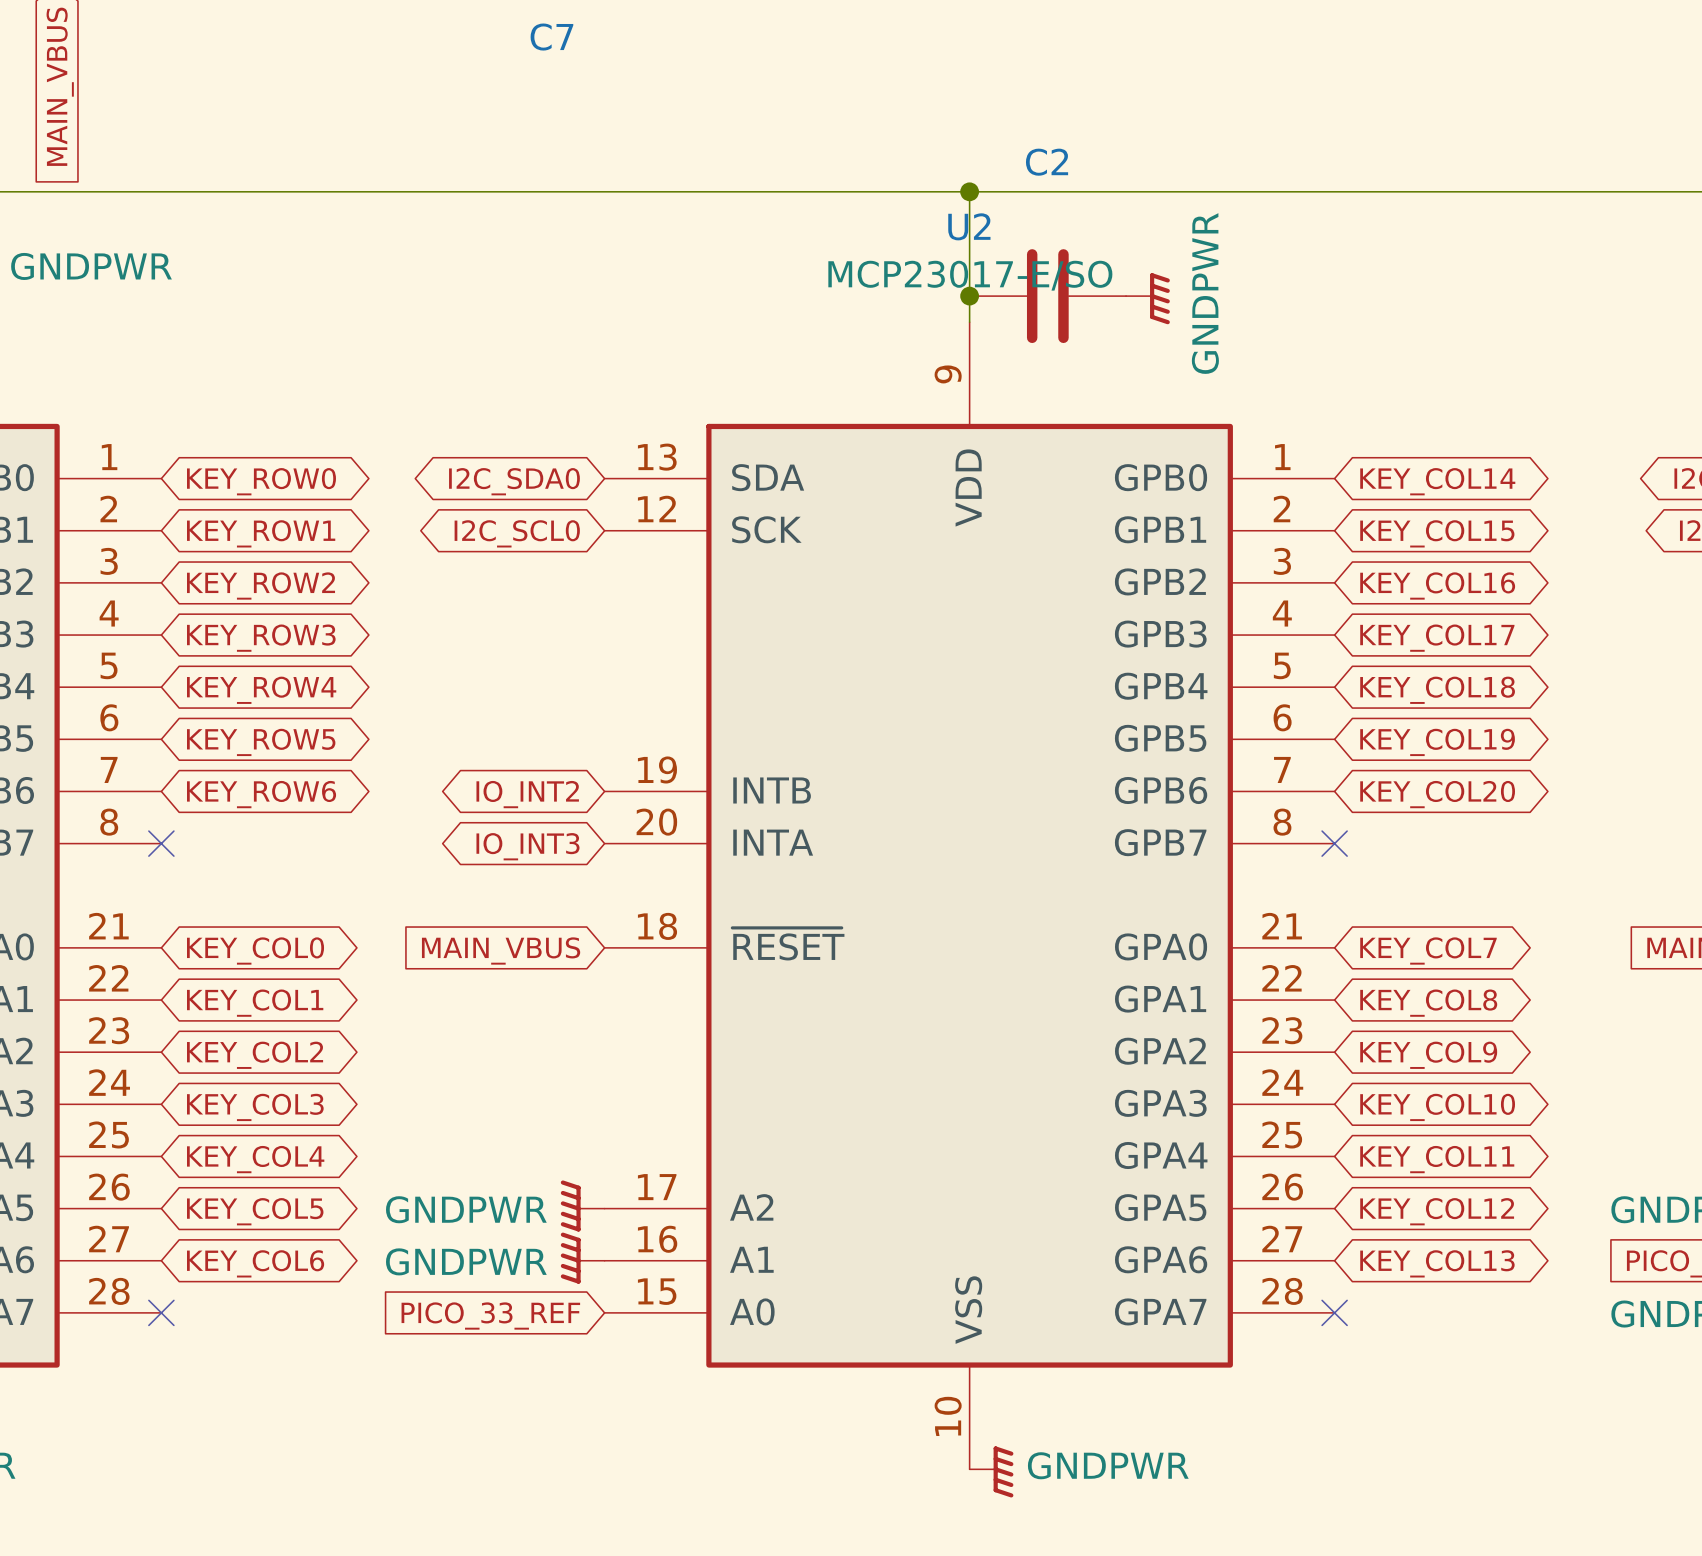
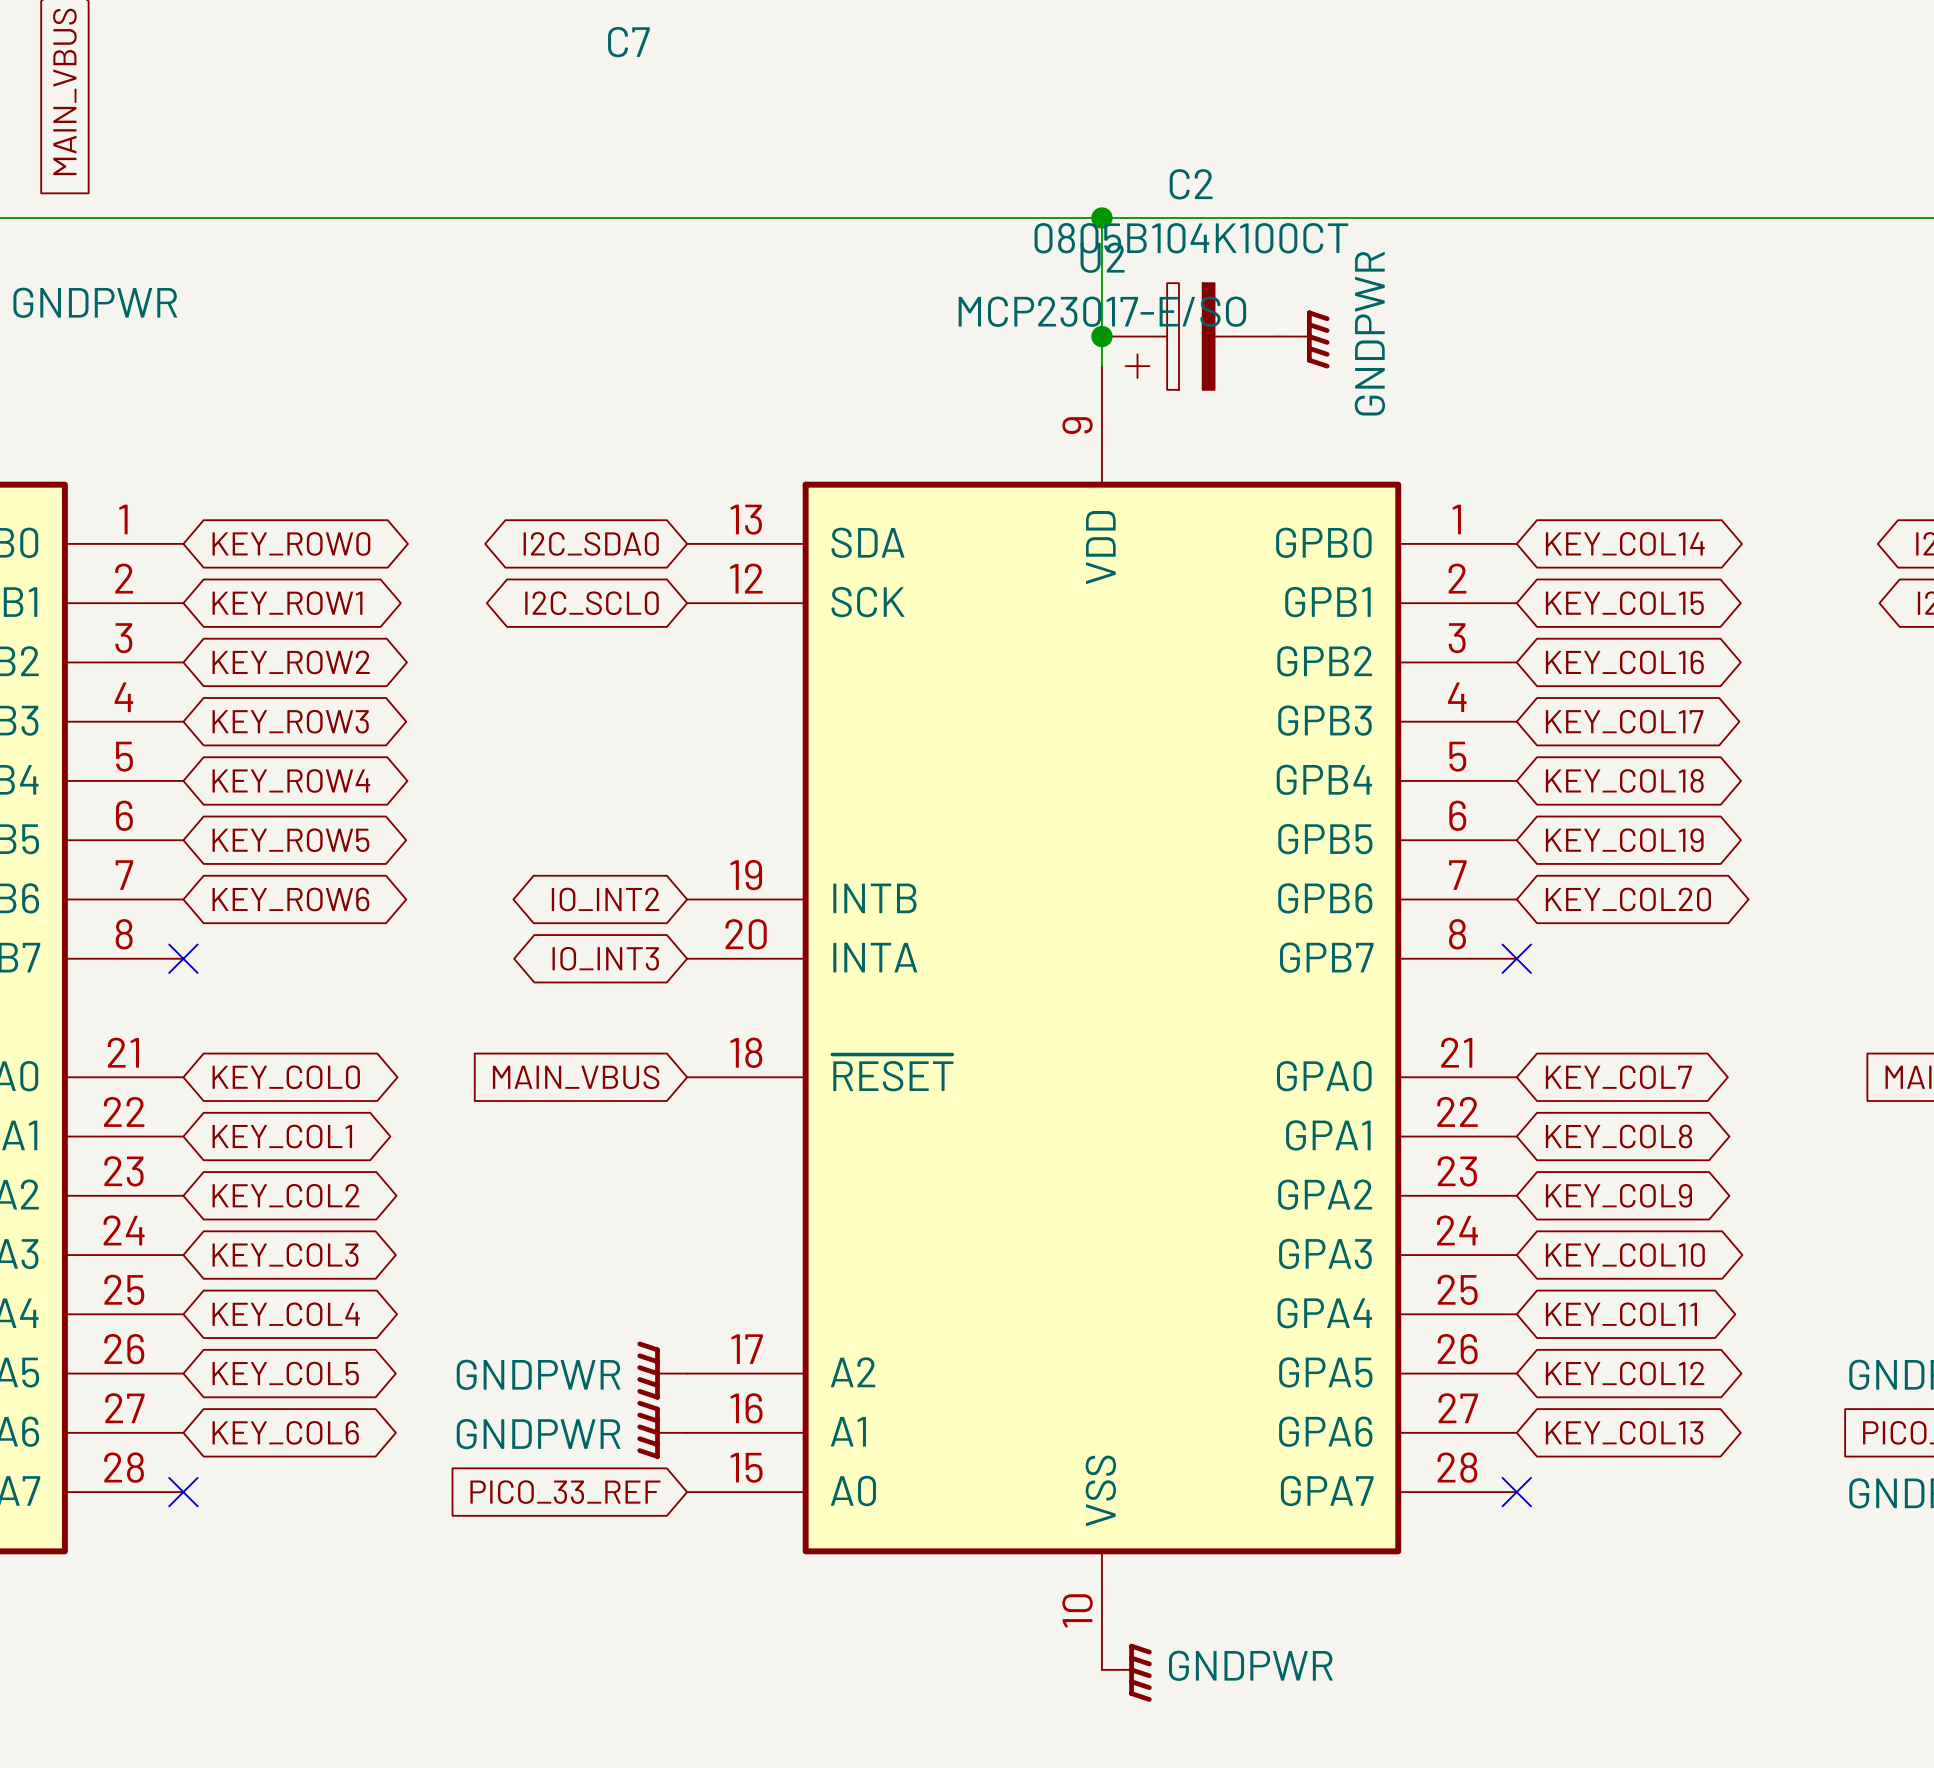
C2 value: none -> 0805B104K100CT (1191, 238)
C2 symbol: [969, 249, 1127, 344] -> [1101, 283, 1280, 390]

